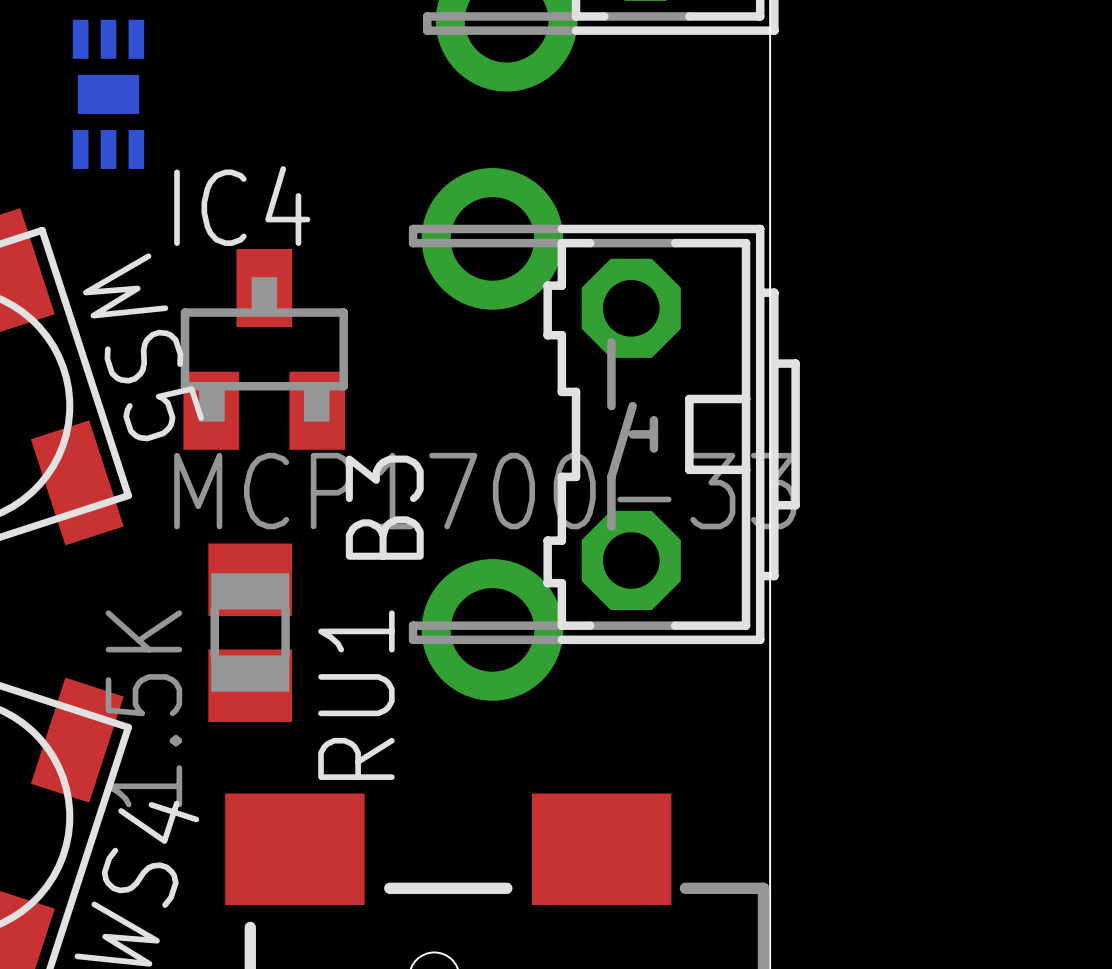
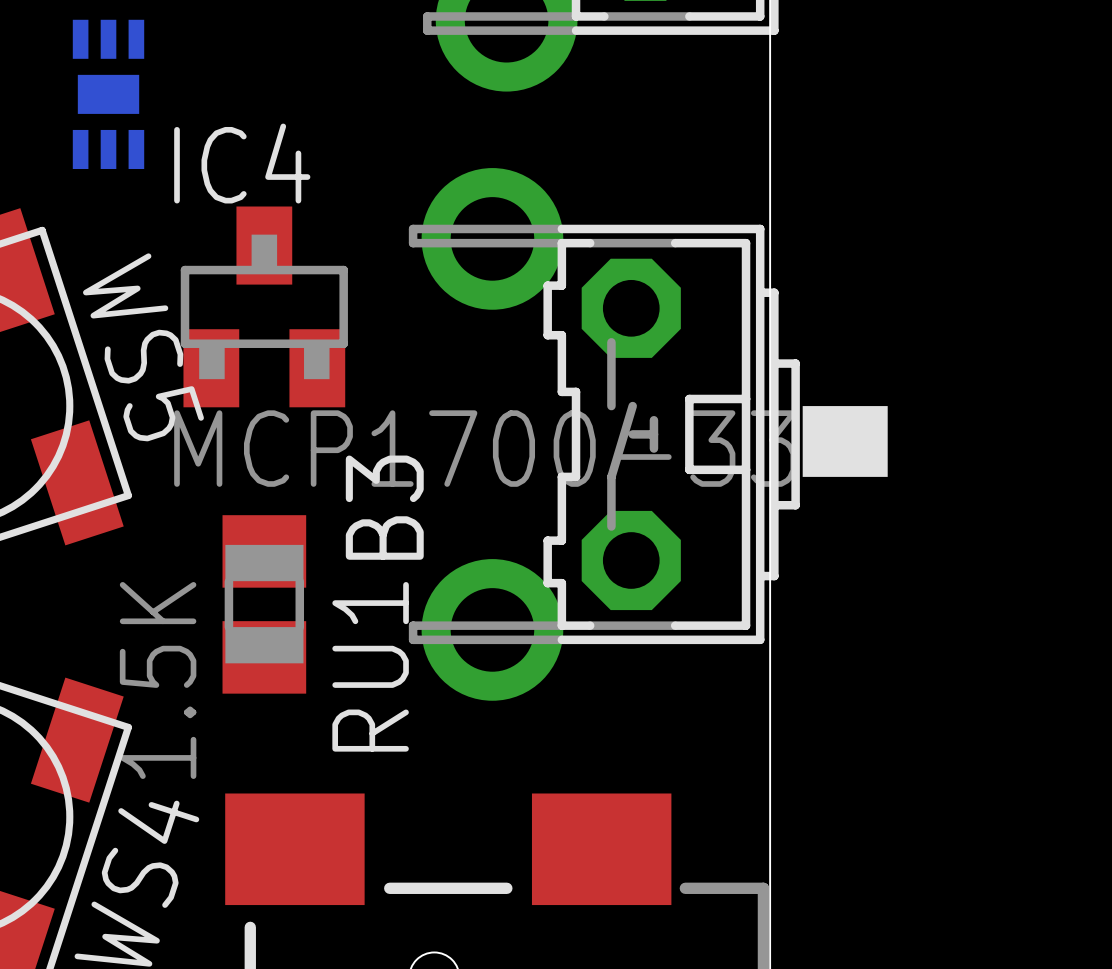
IC4 position: (264, 349) -> (264, 306)
drawing: none -> [802, 406, 888, 477]
RU1 position: (250, 632) -> (264, 604)

